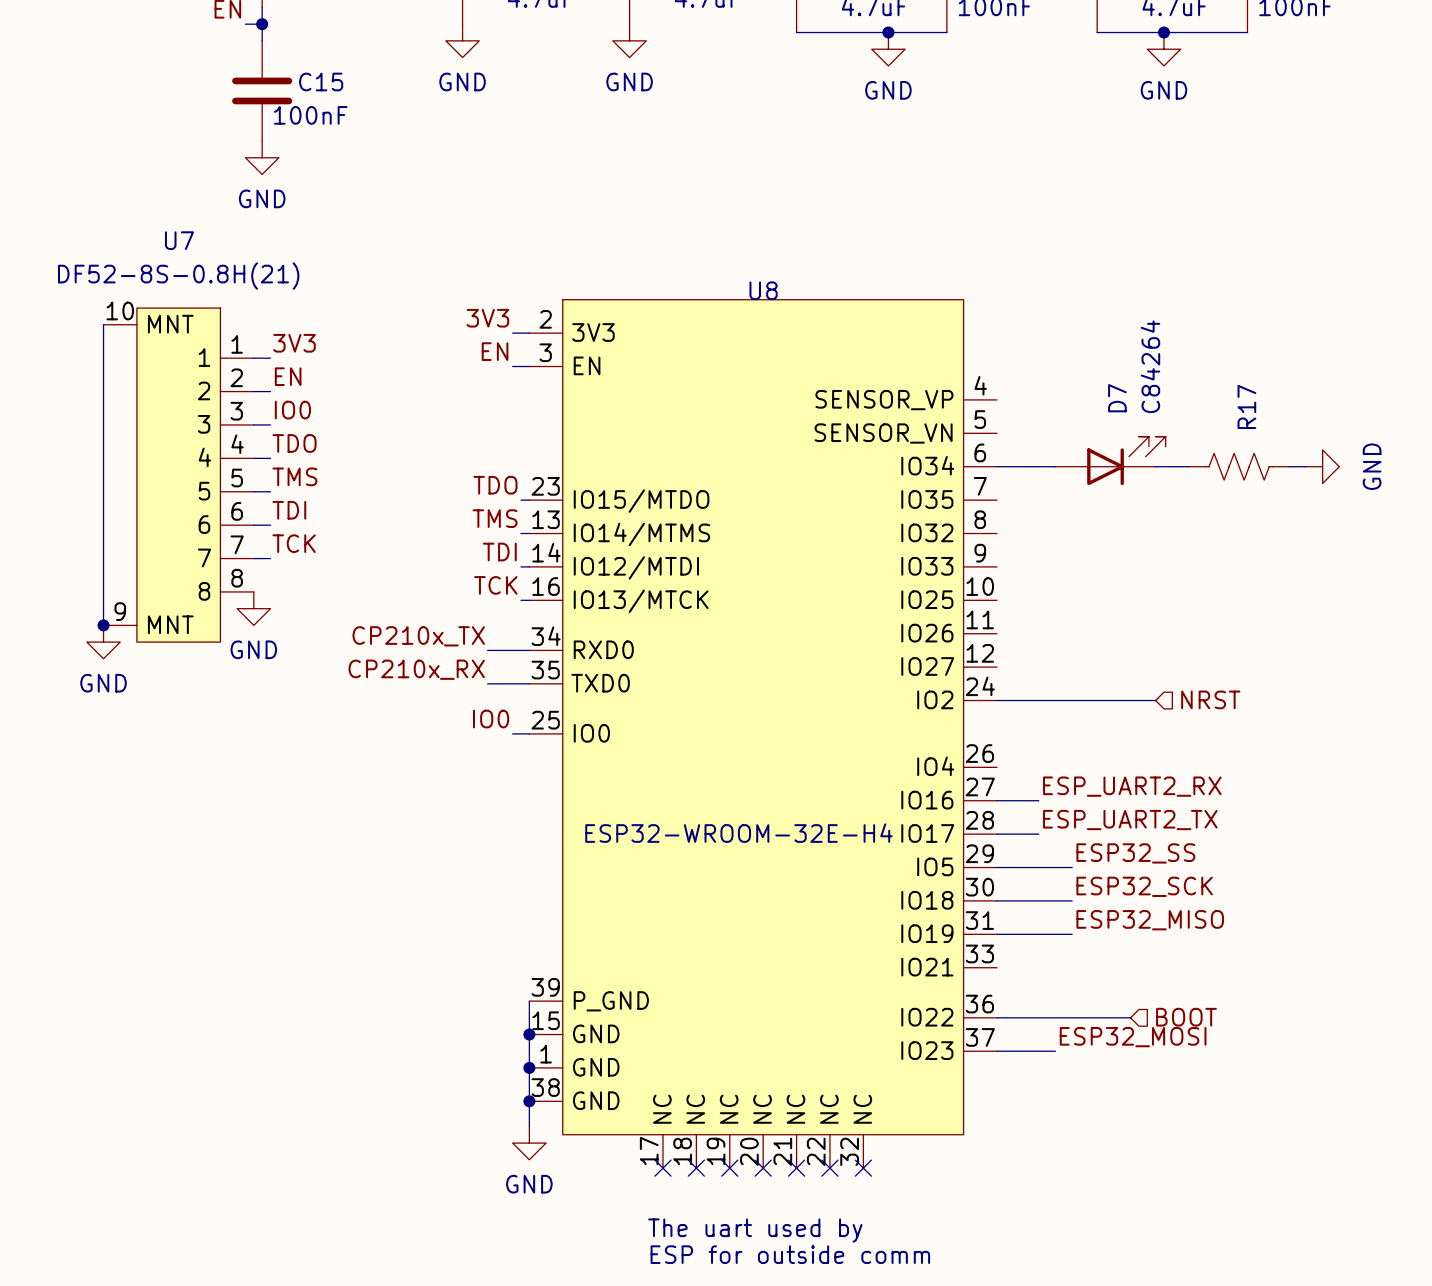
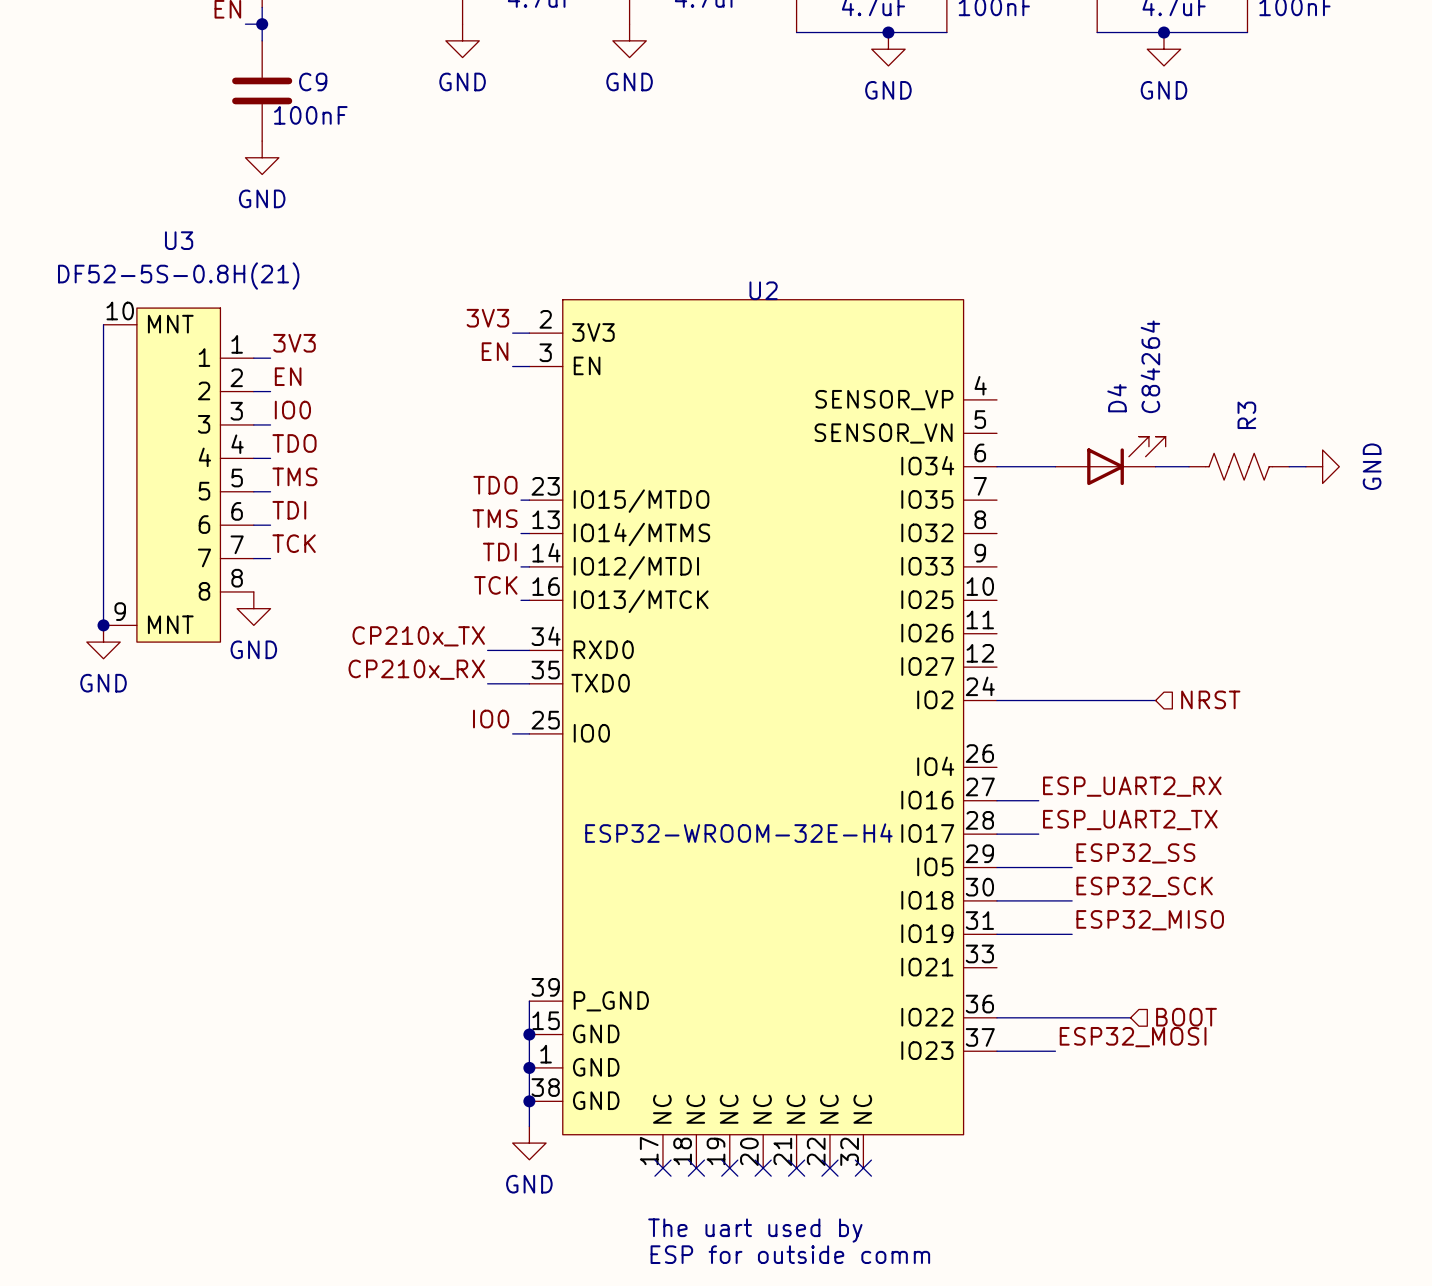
C15 name: C15 (321, 81) -> C9 (313, 81)
U7 name: U7 (179, 240) -> U3 (179, 240)
U7 value: DF52-8S-0.8H(21) (178, 276) -> DF52-5S-0.8H(21) (178, 276)
U8 name: U8 (763, 290) -> U2 (763, 290)
D7 name: D7 (1117, 398) -> D4 (1117, 398)
R17 name: R17 (1246, 406) -> R3 (1246, 415)

